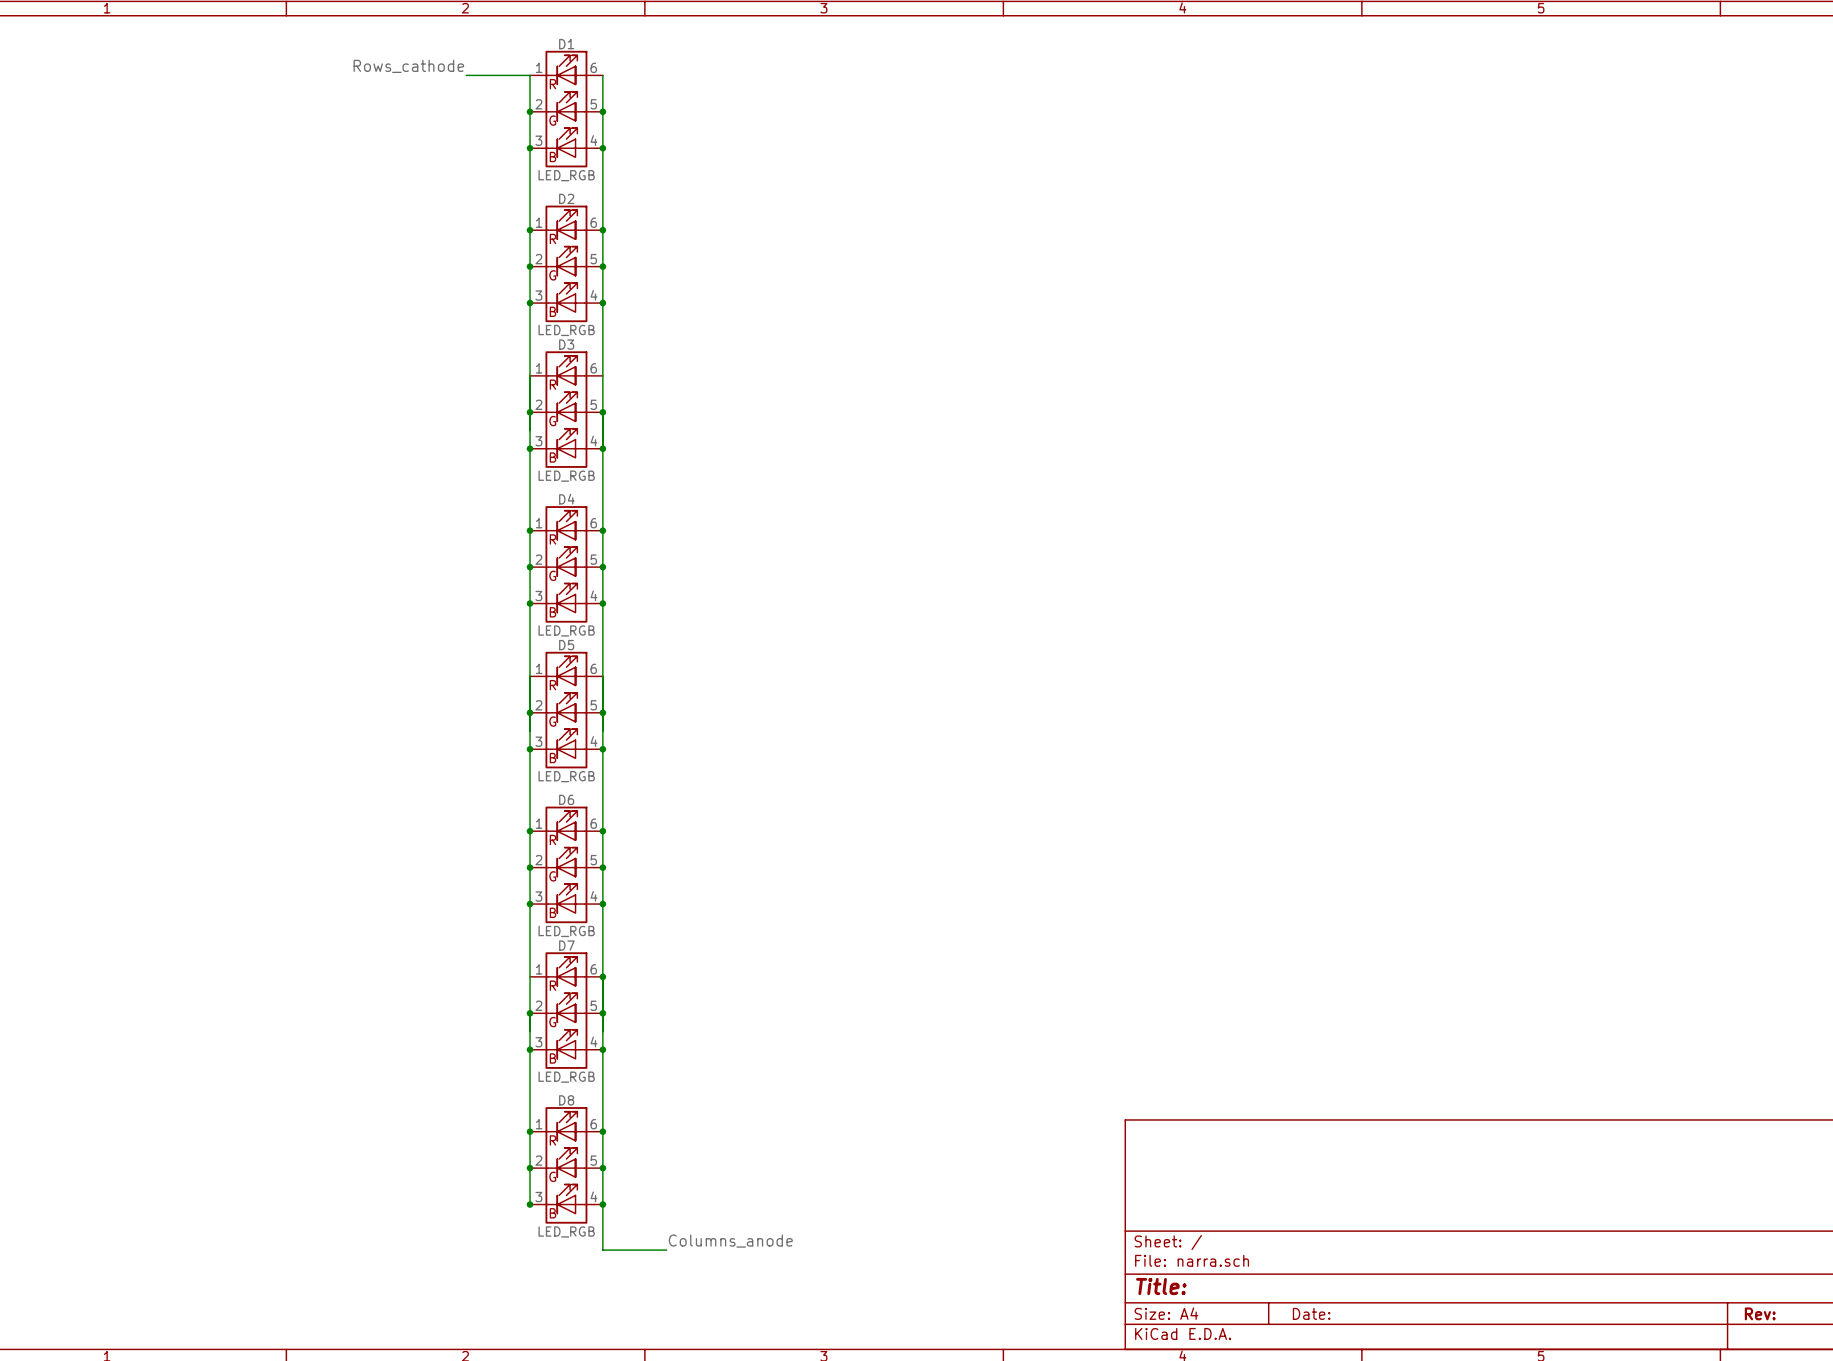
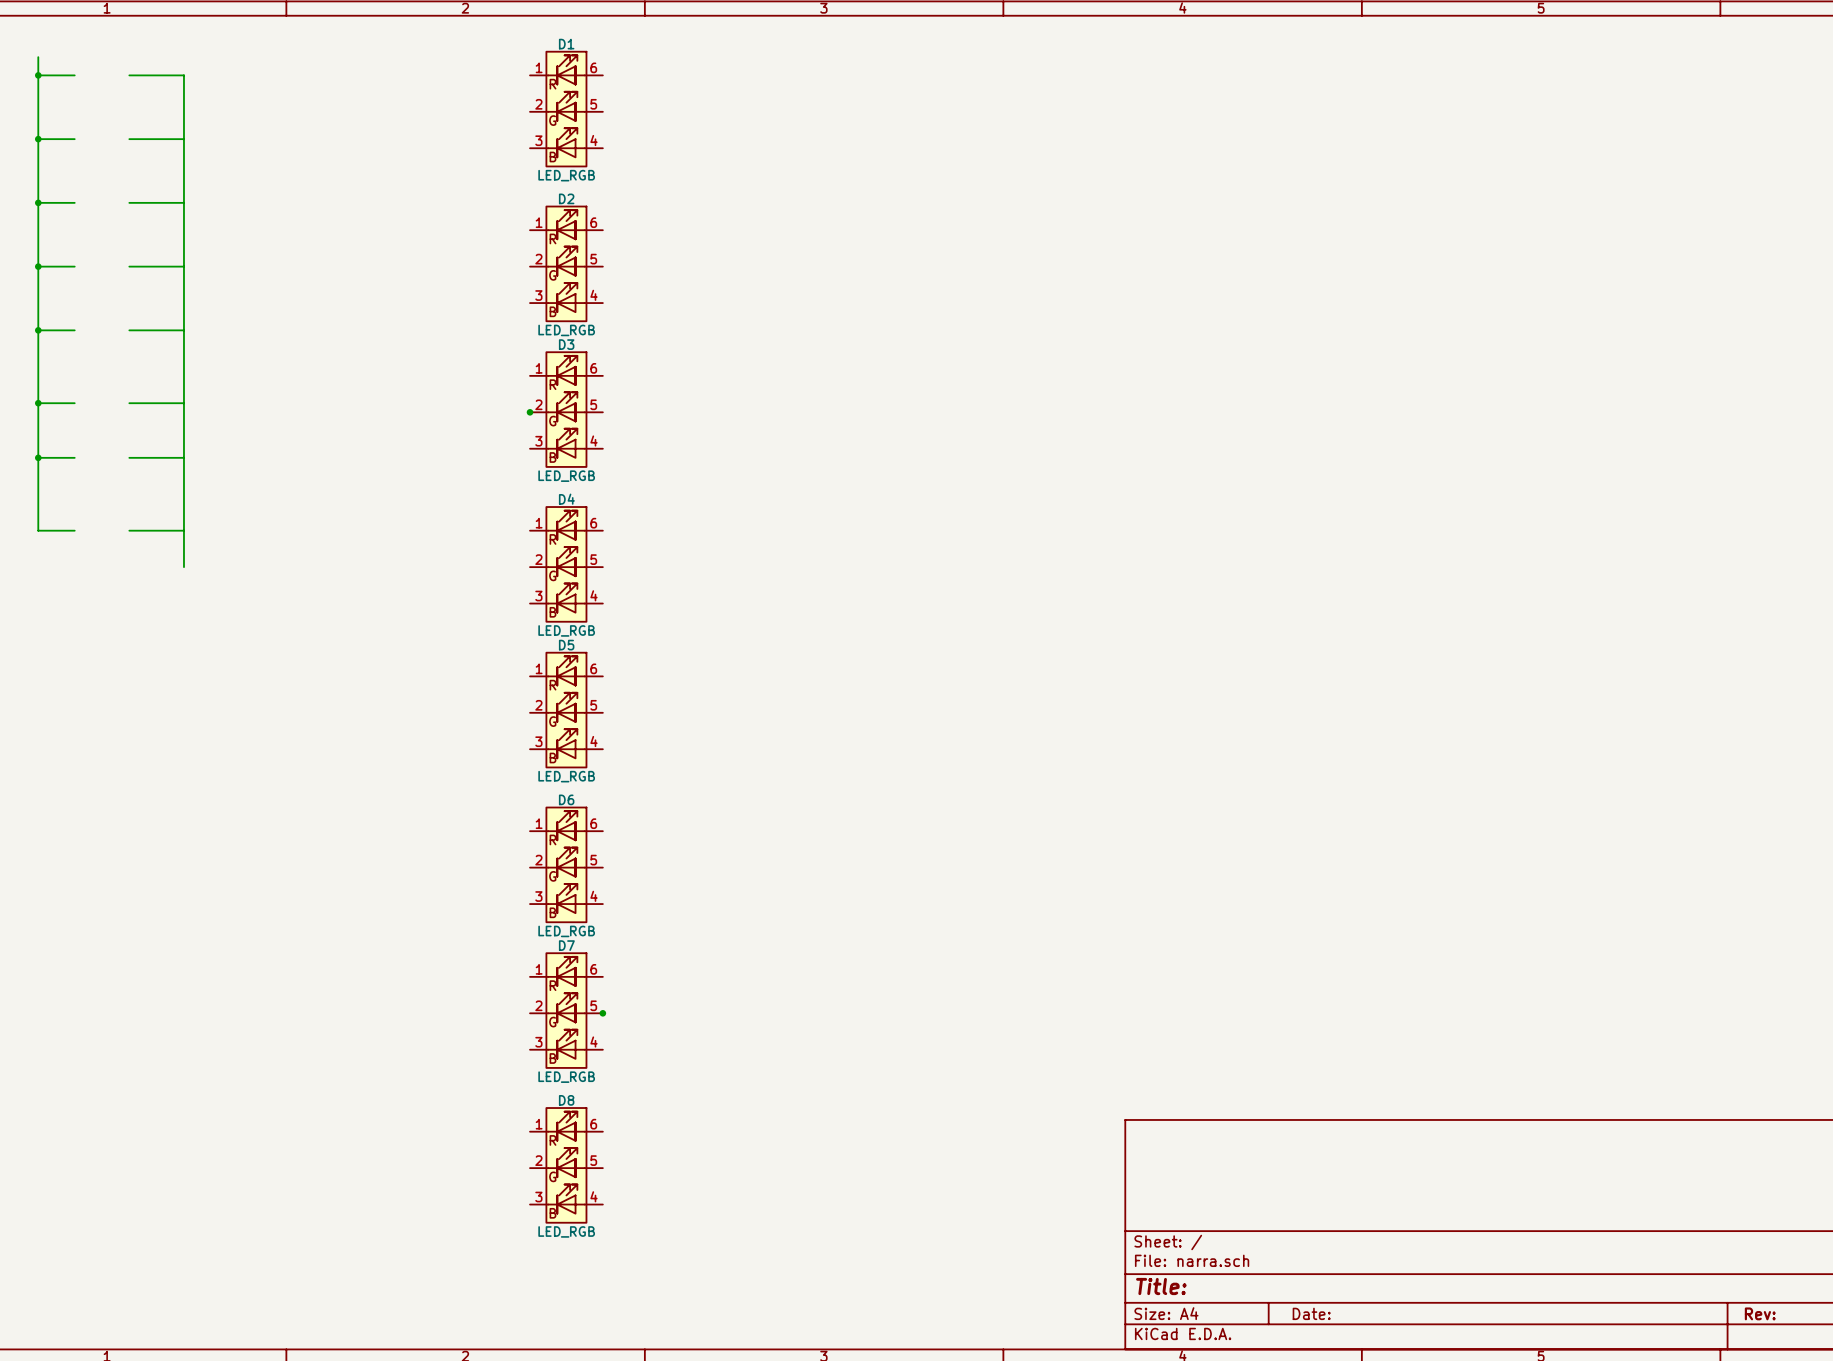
wire: none -> (38, 57) (38, 530) (74, 530)
label: Rows_cathode (408, 66) -> none
wire: none -> (38, 75) (74, 75)
junction: none -> (38, 75)
wire: none -> (129, 75) (183, 75) (183, 567)
wire: (466, 75) (530, 75) (530, 1204) -> none
wire: (602, 75) (602, 1250) (666, 1250) -> none
junction: (530, 111) -> none
junction: (602, 111) -> none
wire: none -> (38, 139) (74, 139)
junction: none -> (38, 139)
wire: none -> (129, 139) (183, 139)
junction: (530, 148) -> none
junction: (602, 148) -> none
wire: none -> (38, 202) (74, 202)
junction: none -> (38, 202)
wire: none -> (129, 202) (183, 202)
junction: (530, 230) -> none
junction: (602, 230) -> none
wire: none -> (38, 266) (74, 266)
junction: none -> (38, 266)
wire: none -> (129, 266) (183, 266)
junction: (530, 266) -> none
junction: (602, 266) -> none
junction: (530, 303) -> none
junction: (602, 303) -> none
wire: none -> (38, 330) (74, 330)
junction: none -> (38, 330)
wire: none -> (129, 330) (183, 330)
wire: none -> (38, 403) (74, 403)
junction: none -> (38, 403)
wire: none -> (129, 403) (183, 403)
junction: (602, 412) -> none
junction: (530, 448) -> none
junction: (602, 448) -> none
wire: none -> (38, 457) (74, 457)
junction: none -> (38, 457)
wire: none -> (129, 457) (183, 457)
wire: none -> (129, 530) (183, 530)
junction: (530, 530) -> none
junction: (602, 530) -> none
junction: (530, 567) -> none
junction: (602, 567) -> none
junction: (530, 603) -> none
junction: (602, 603) -> none
junction: (530, 712) -> none
junction: (602, 712) -> none
junction: (530, 749) -> none
junction: (602, 749) -> none
junction: (530, 831) -> none
junction: (602, 831) -> none
junction: (530, 867) -> none
junction: (602, 867) -> none
junction: (530, 904) -> none
junction: (602, 904) -> none
junction: (602, 976) -> none
junction: (530, 1013) -> none
junction: (530, 1049) -> none
junction: (602, 1049) -> none
junction: (530, 1131) -> none
junction: (602, 1131) -> none
junction: (530, 1168) -> none
junction: (602, 1168) -> none
junction: (530, 1204) -> none
junction: (602, 1204) -> none
label: Columns_anode (730, 1241) -> none

